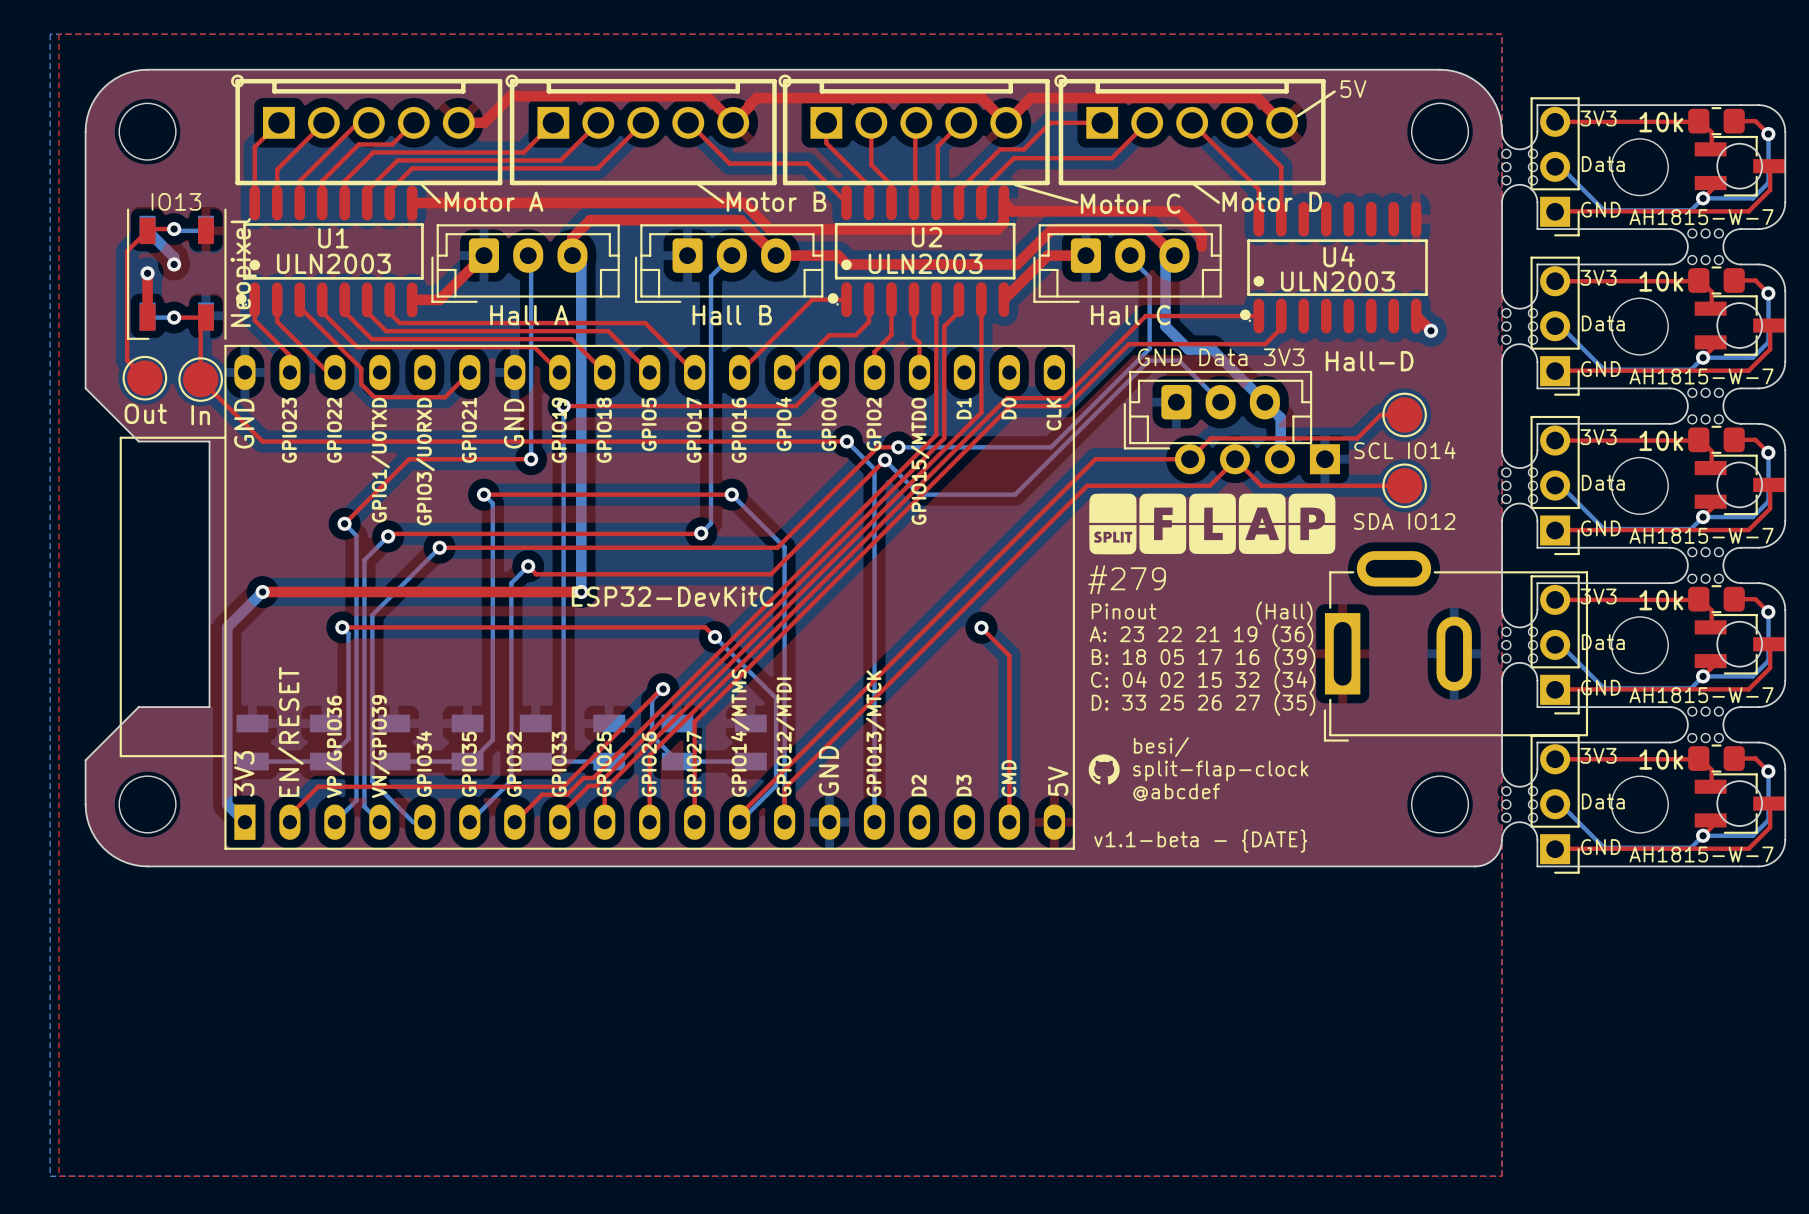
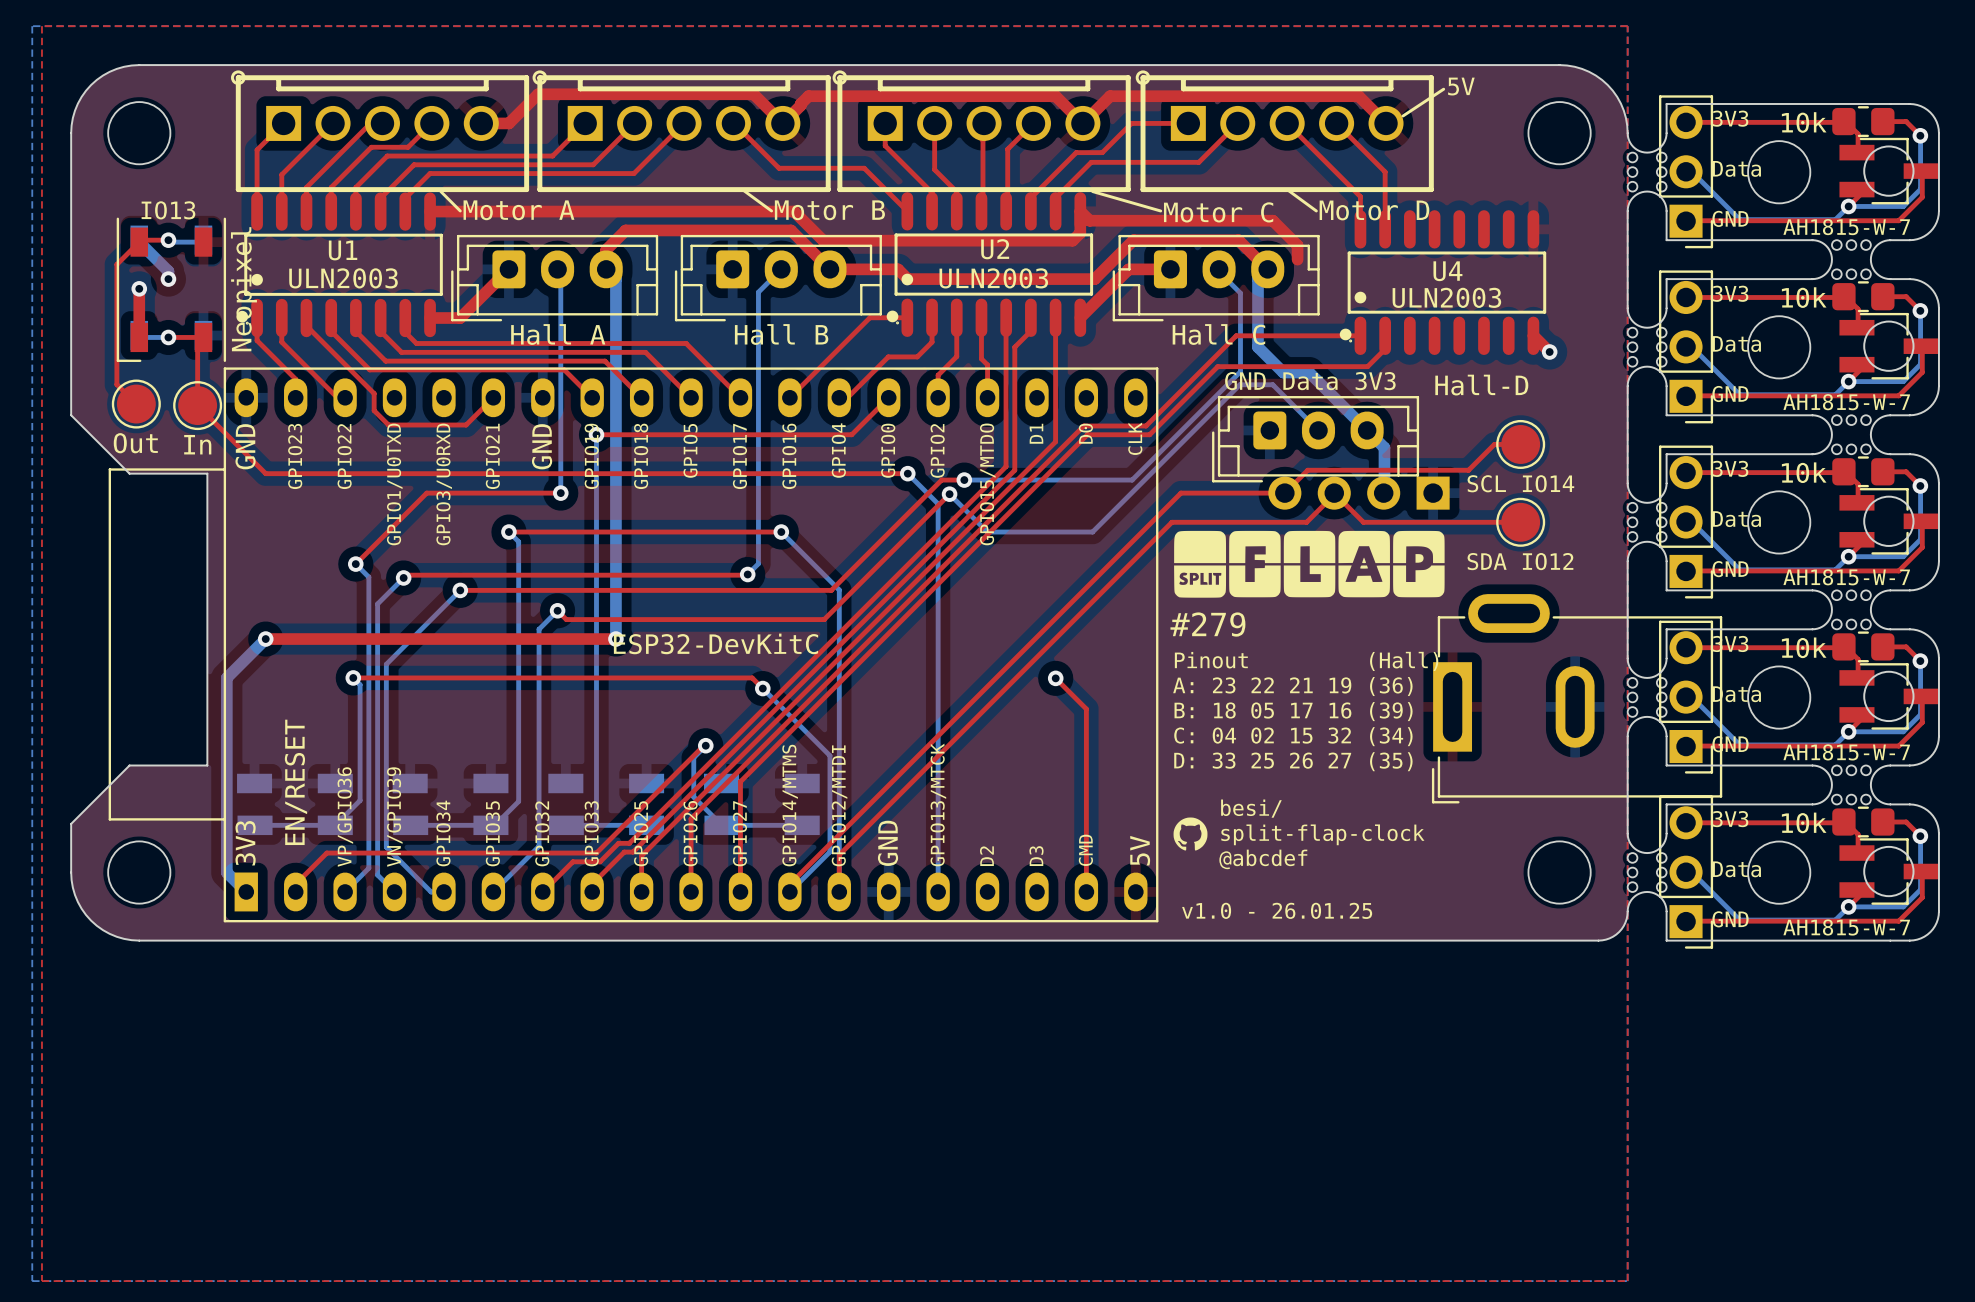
text: v1.1-beta - {DATE} (1200, 841) -> v1.0 - 26.01.25 (1277, 910)

